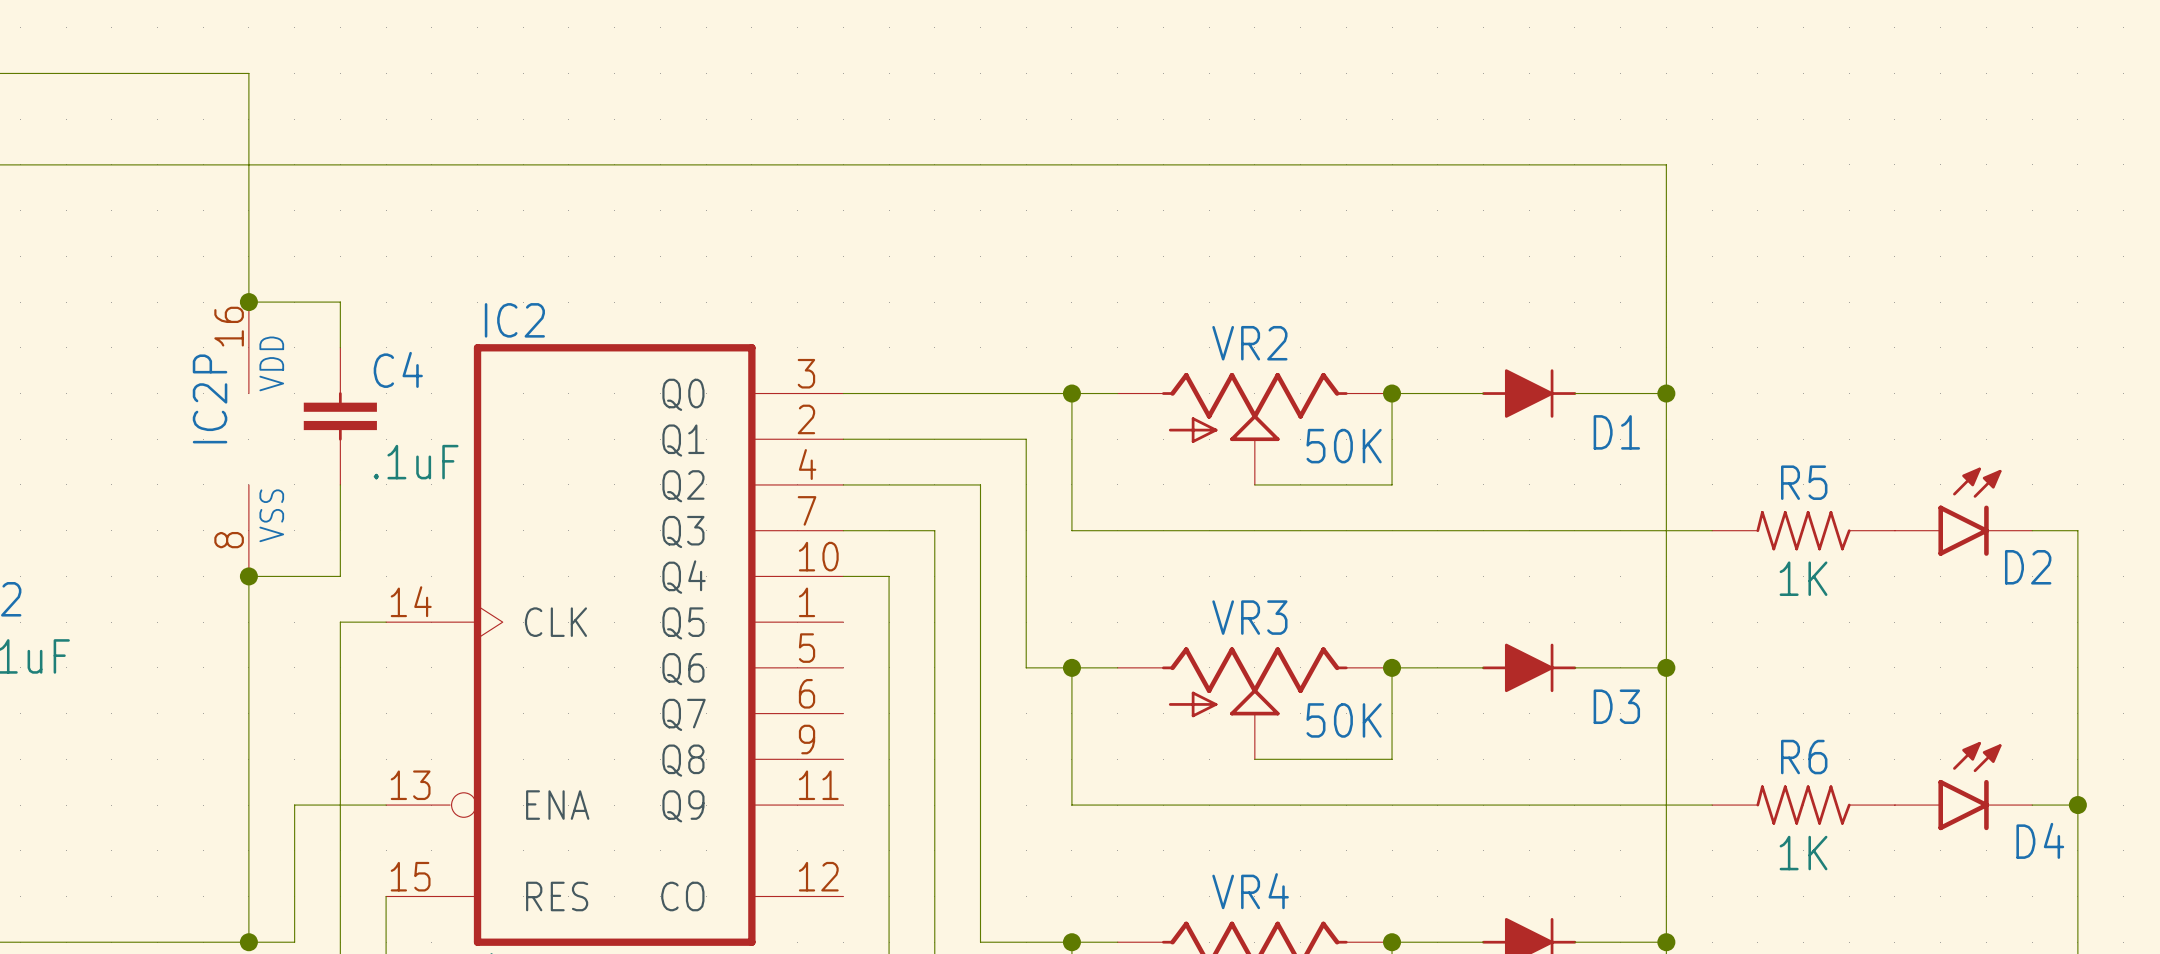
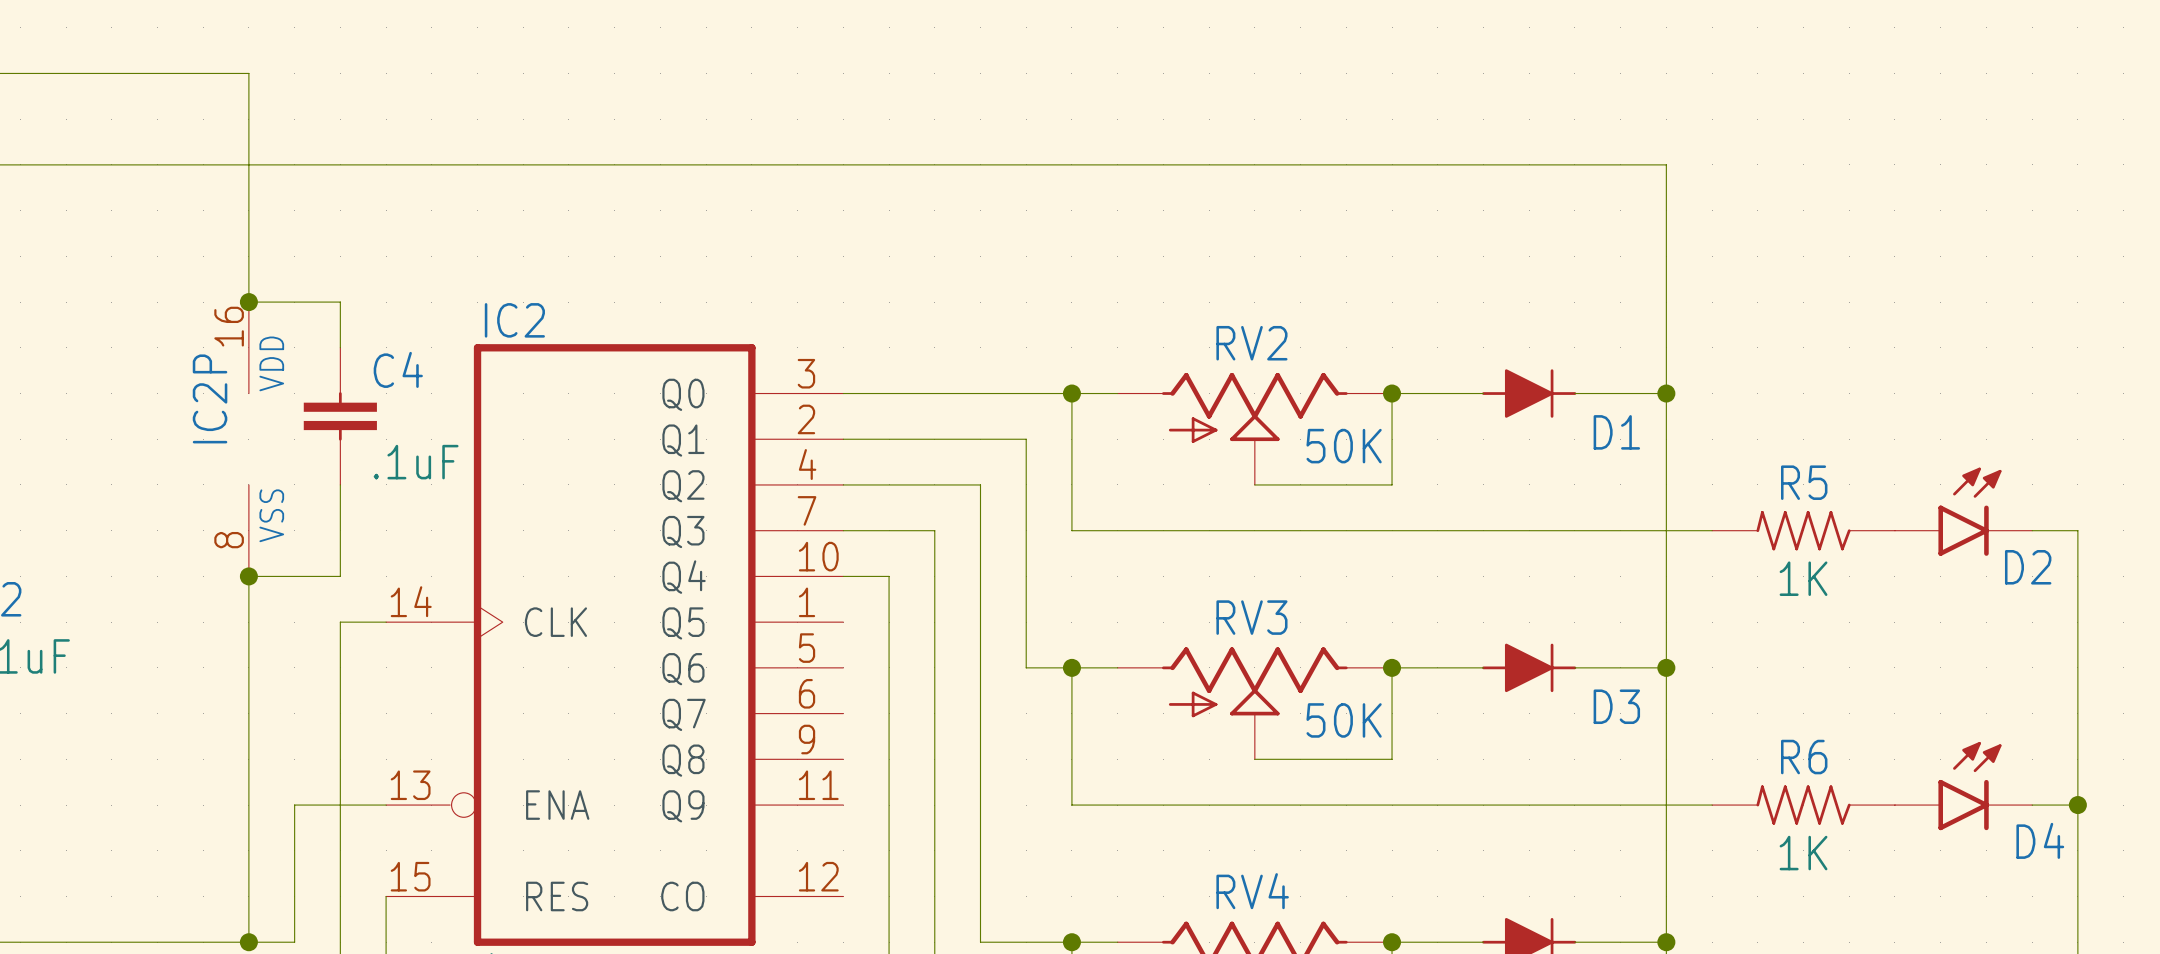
VR2 name: VR2 (1249, 343) -> RV2 (1251, 343)
VR3 name: VR3 (1249, 617) -> RV3 (1251, 617)
VR4 name: VR4 (1250, 891) -> RV4 (1252, 891)

